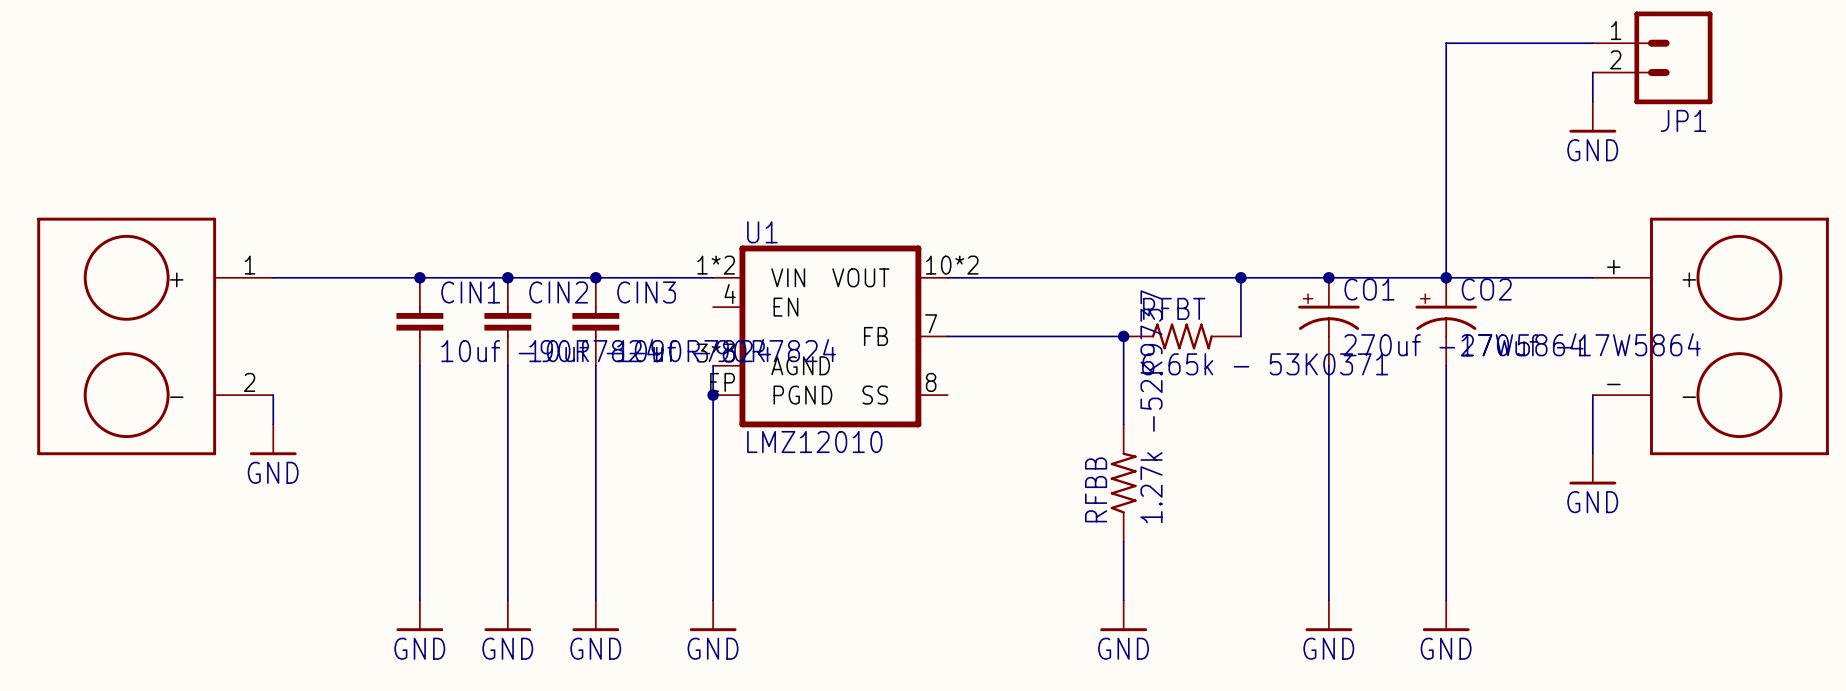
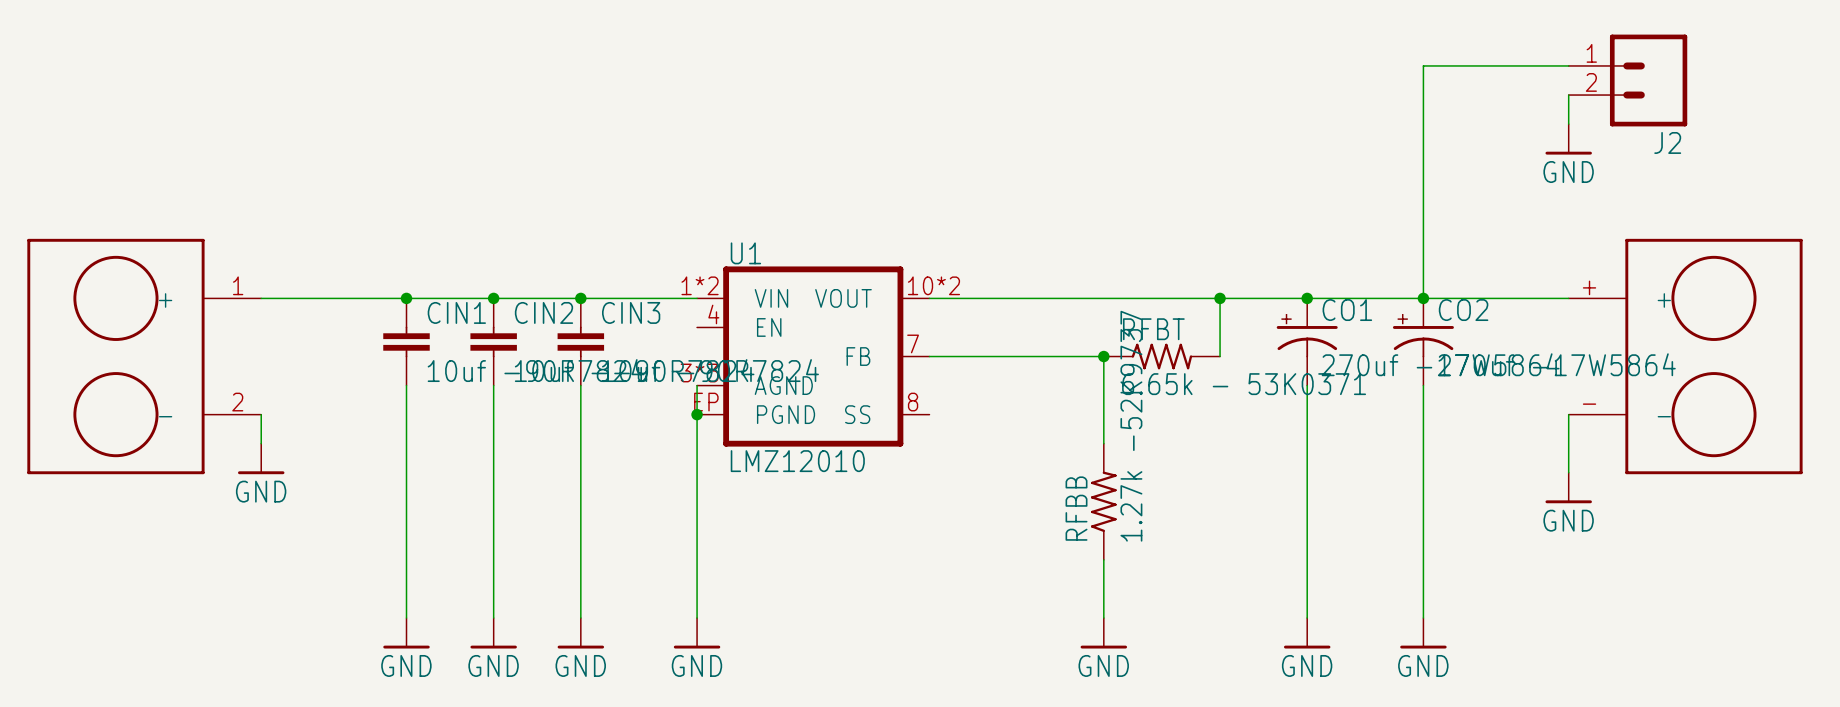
JP1 name: JP1 (1683, 120) -> J2 (1667, 142)

